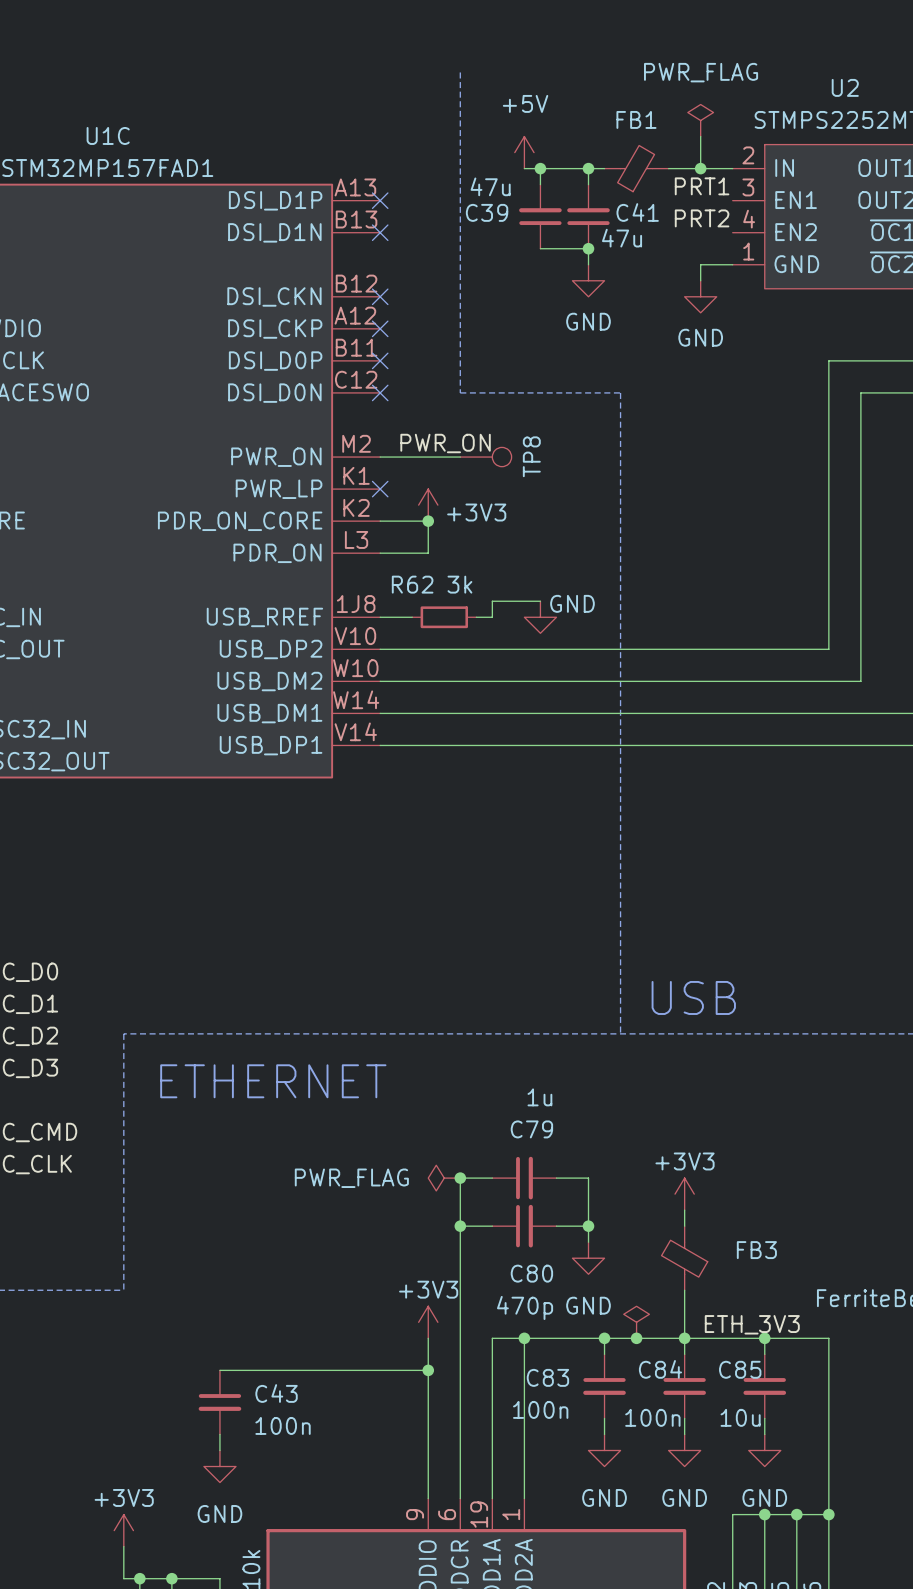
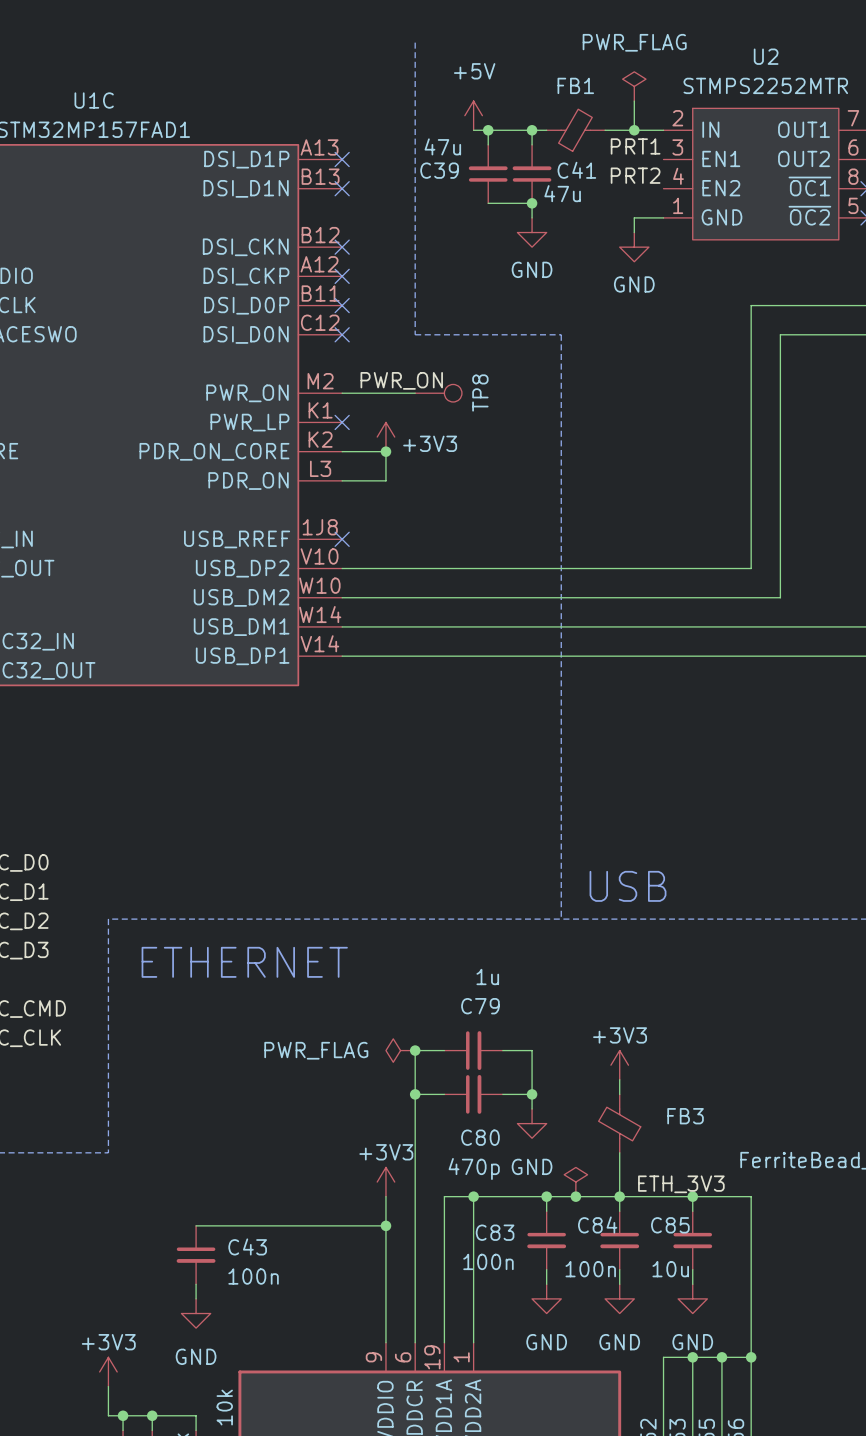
wire: (540, 601) (492, 601) (492, 617) (476, 617) -> none
wire: (380, 617) (412, 617) -> none
no-connect mark: none -> (342, 539)
R62: 3k (444, 617) -> none
power symbol: GND (540, 617) -> none

